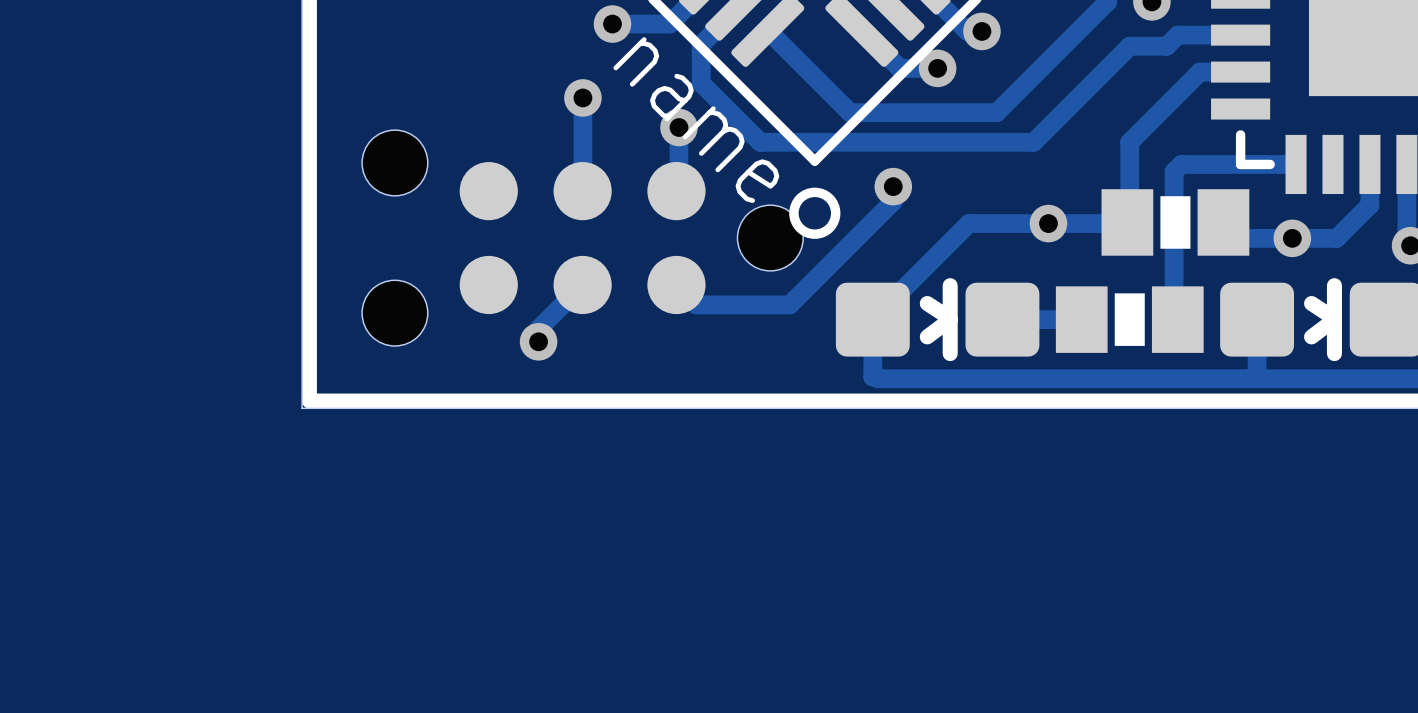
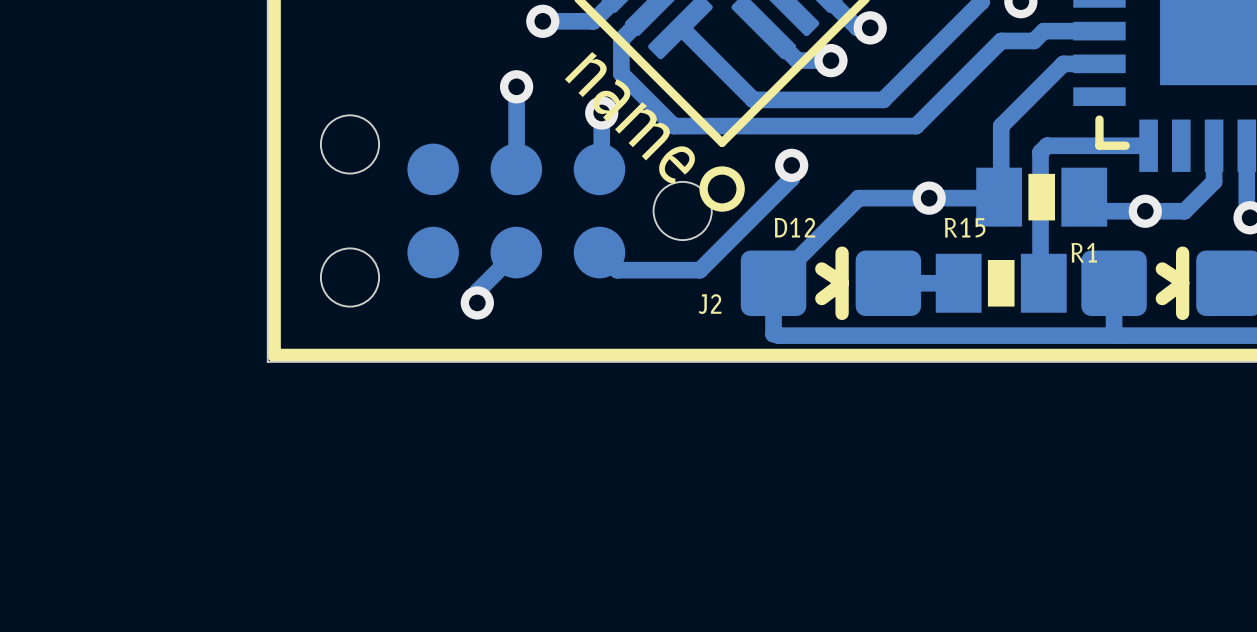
D12 name: none -> D12 (794, 227)
R15 name: none -> R15 (965, 227)
R1 name: none -> R1 (1084, 252)
J2 name: none -> J2 (710, 304)

